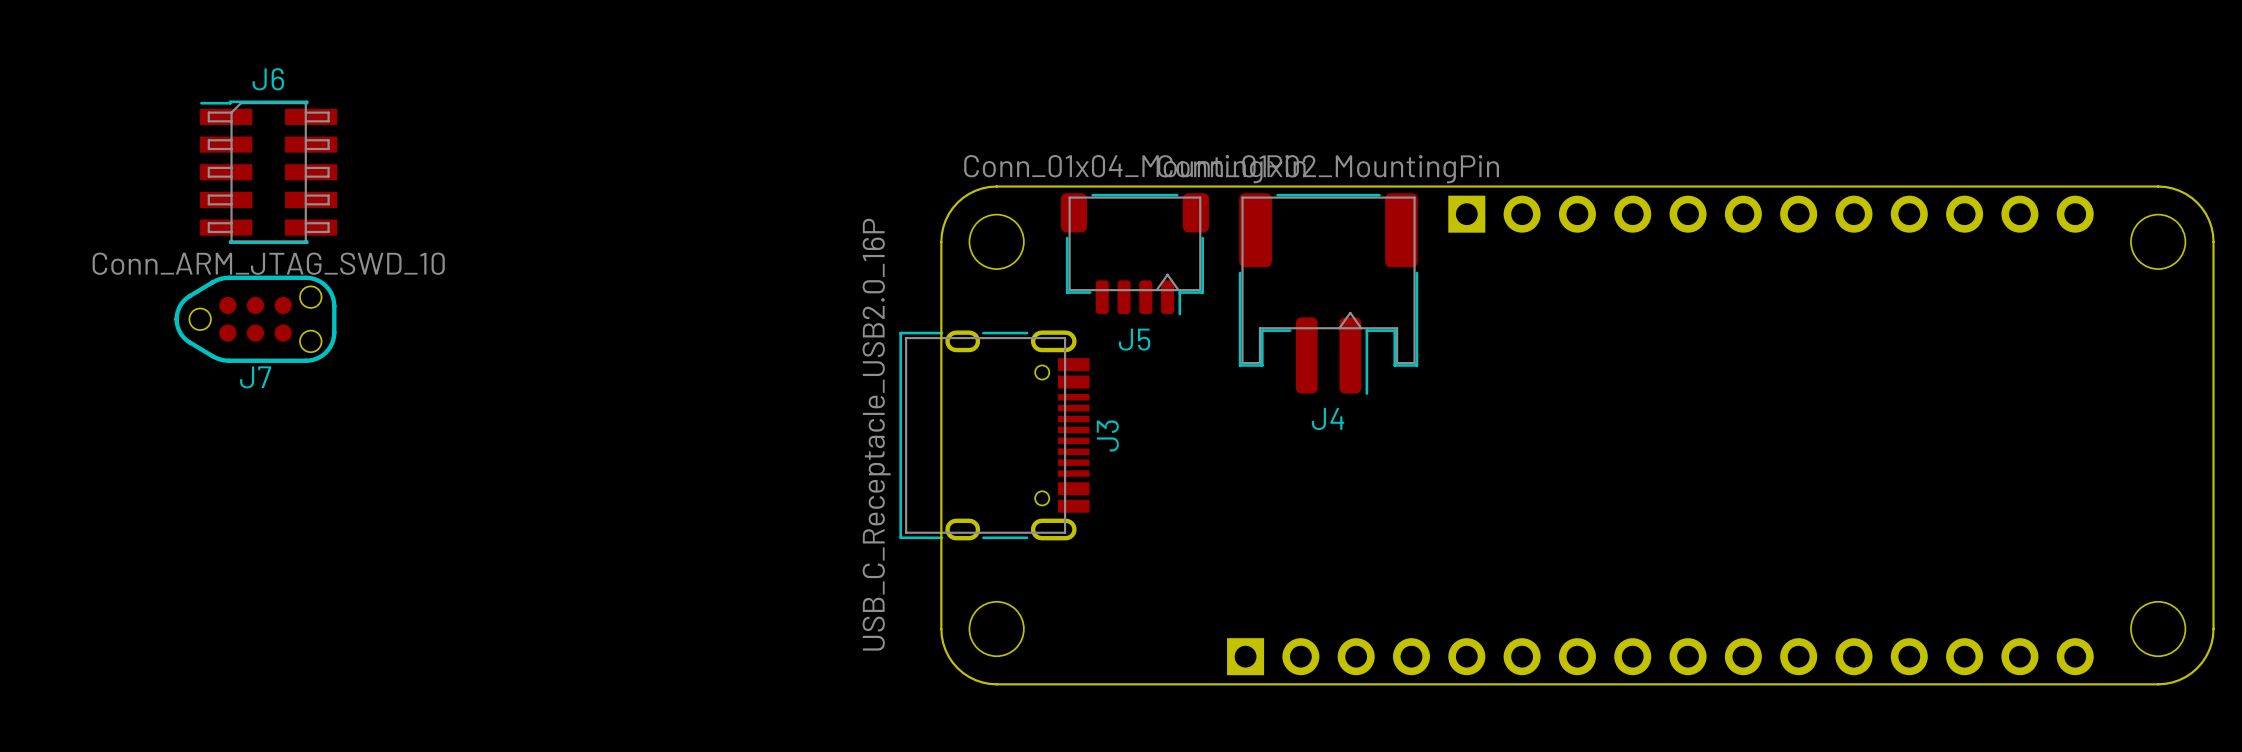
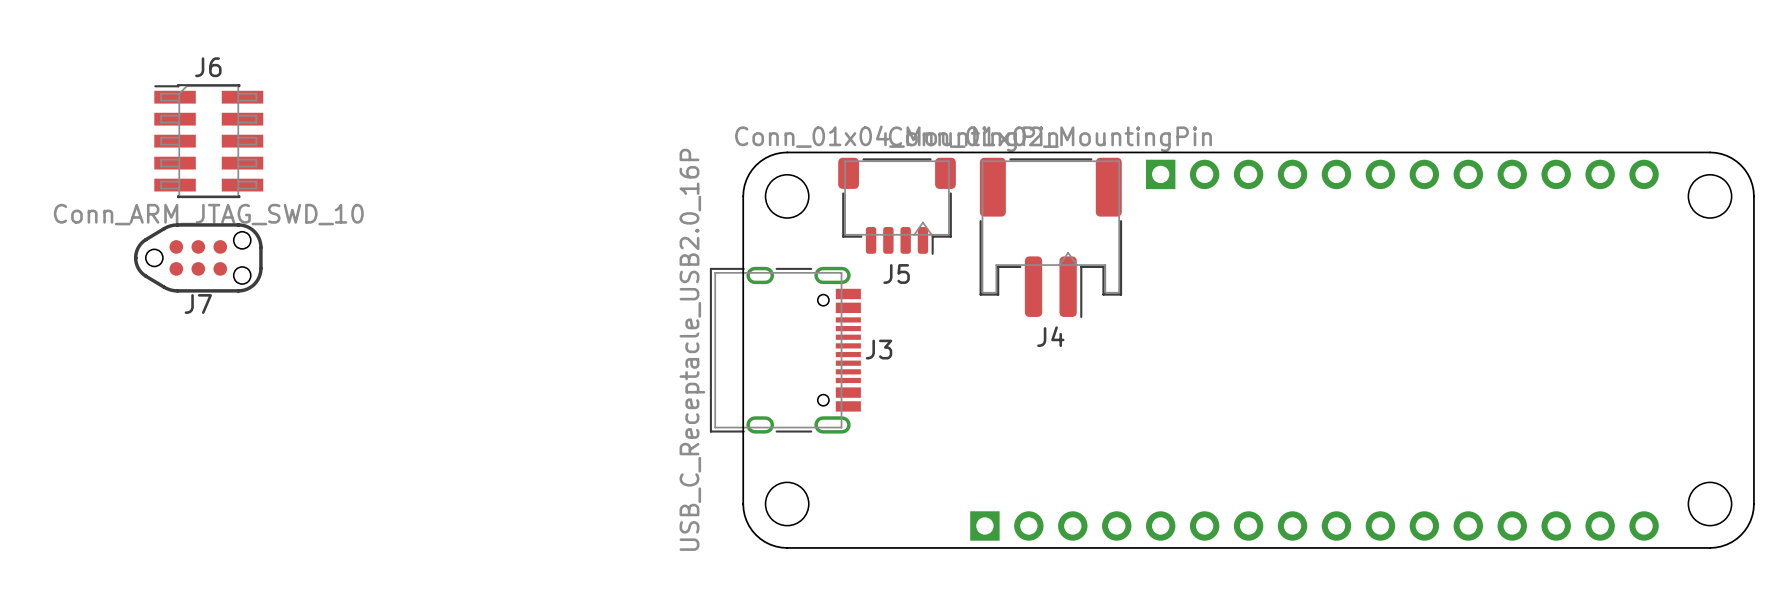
J3 name rotation: 0° (1107, 435) -> 90° clockwise (879, 349)

